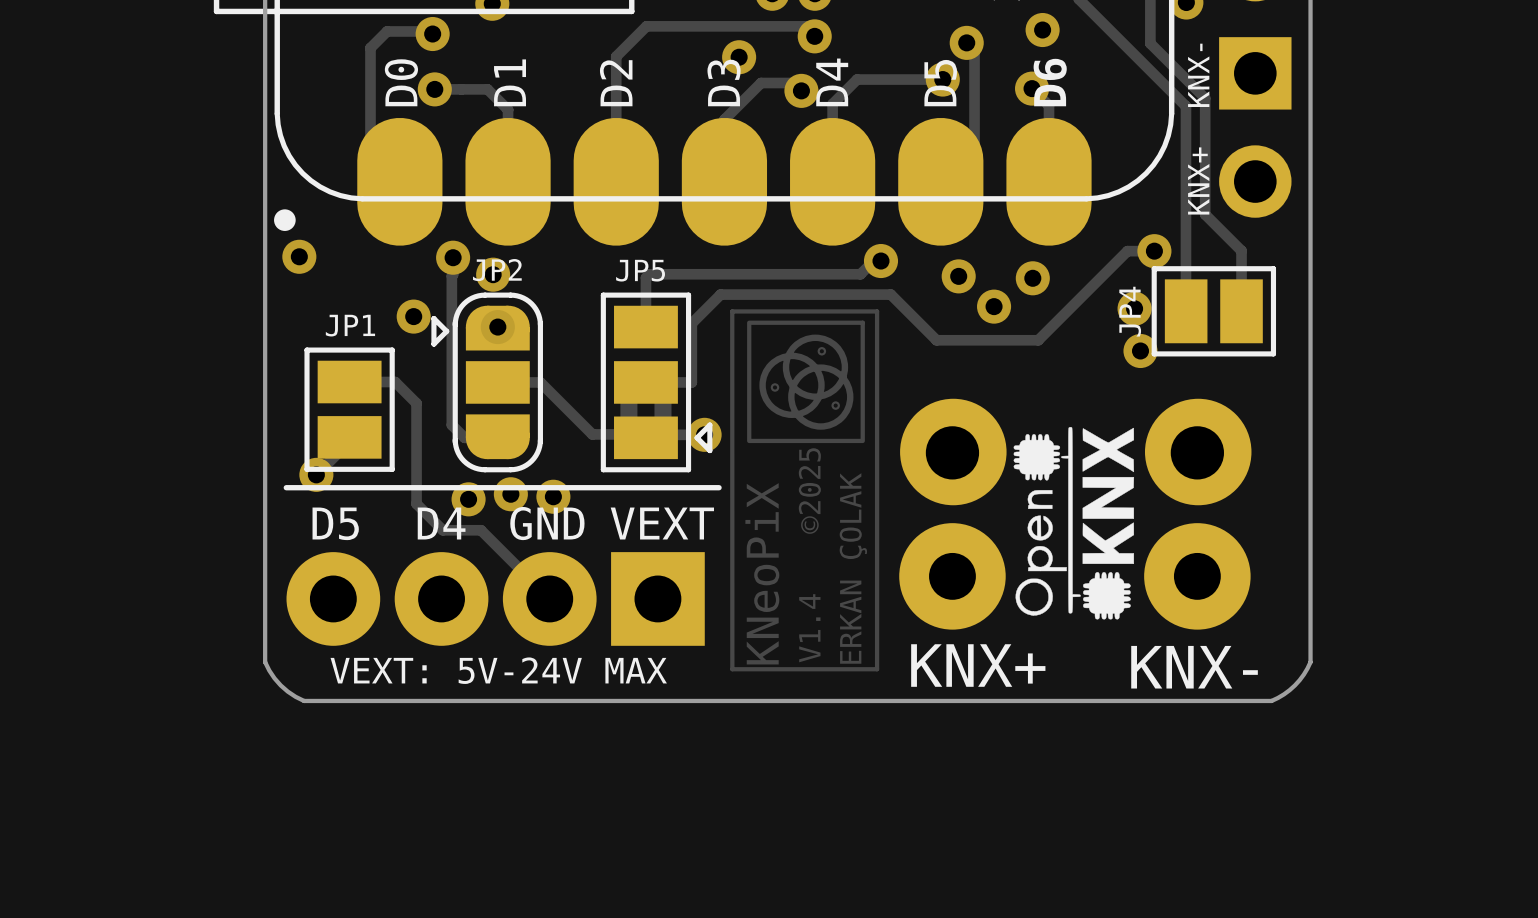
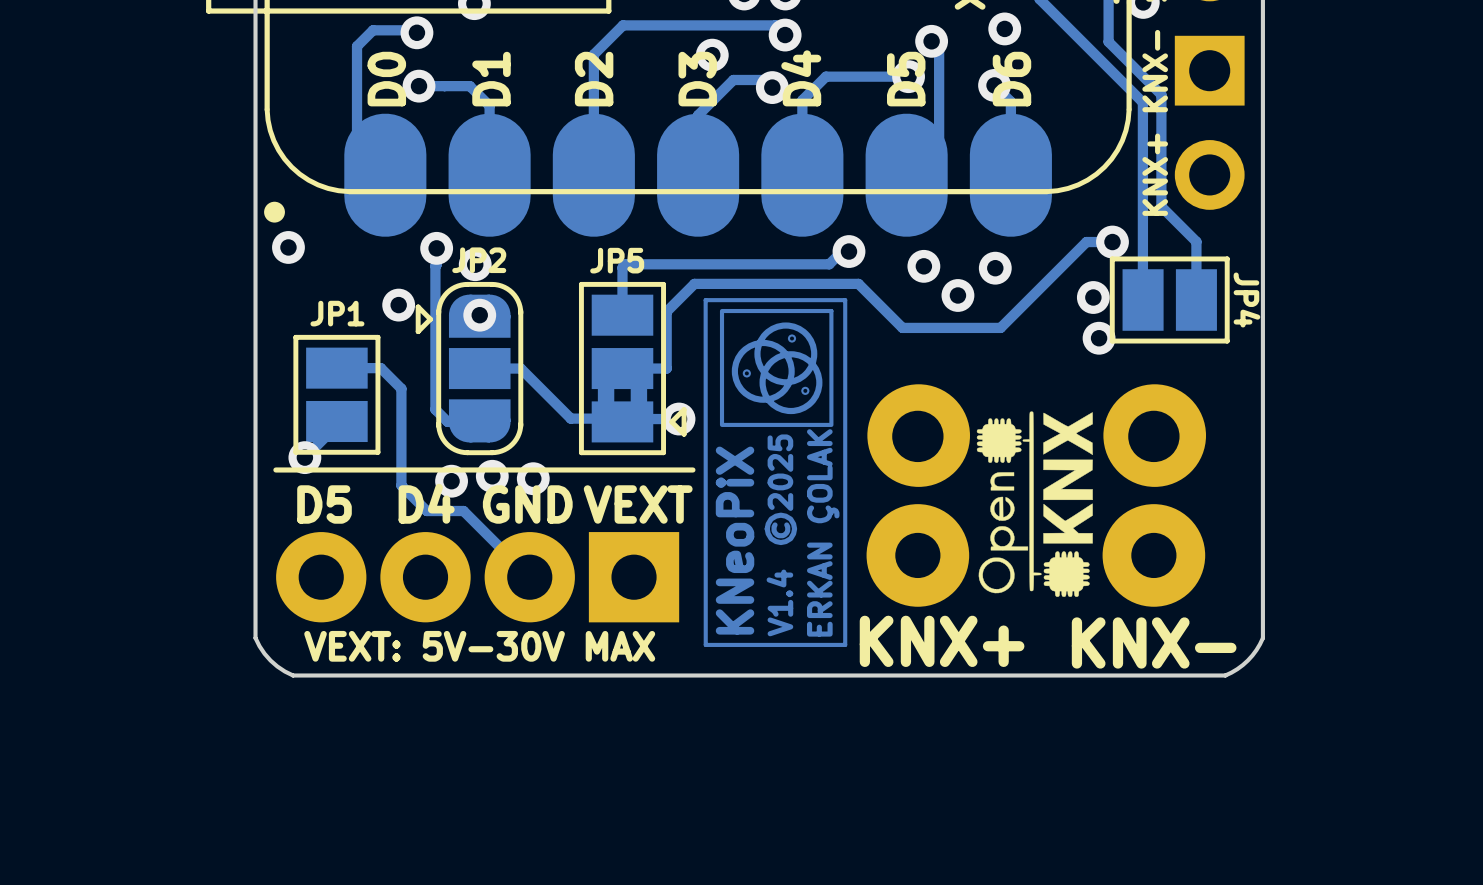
JP4 name rotation: 0° (1130, 311) -> 180° (1246, 300)
JP4 name position: JP4 (1130, 311) -> JP4 (1246, 300)
part text: VEXT: 5V-24V MAX (498, 670) -> VEXT: 5V-30V MAX (479, 646)

